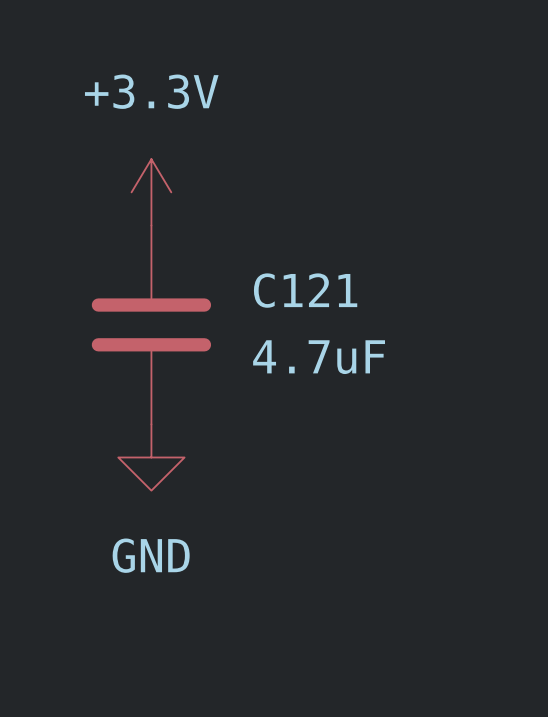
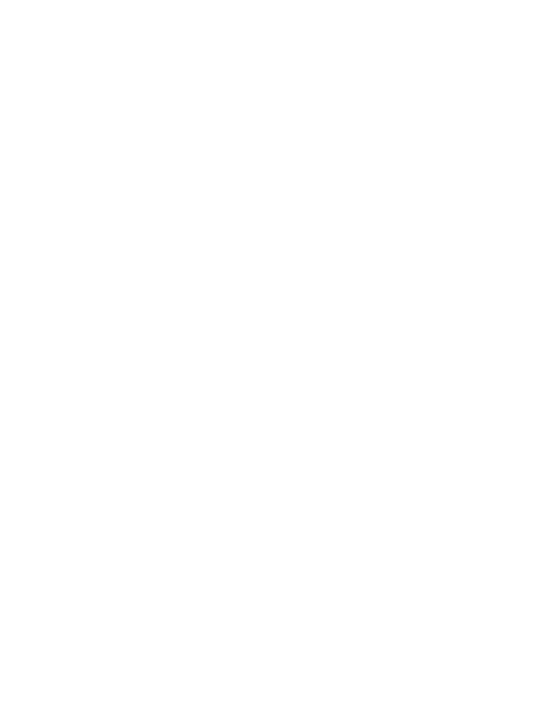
power symbol: +3.3V (151, 192) -> none
C121: 4.7uF (151, 324) -> none
power symbol: GND (151, 457) -> none

